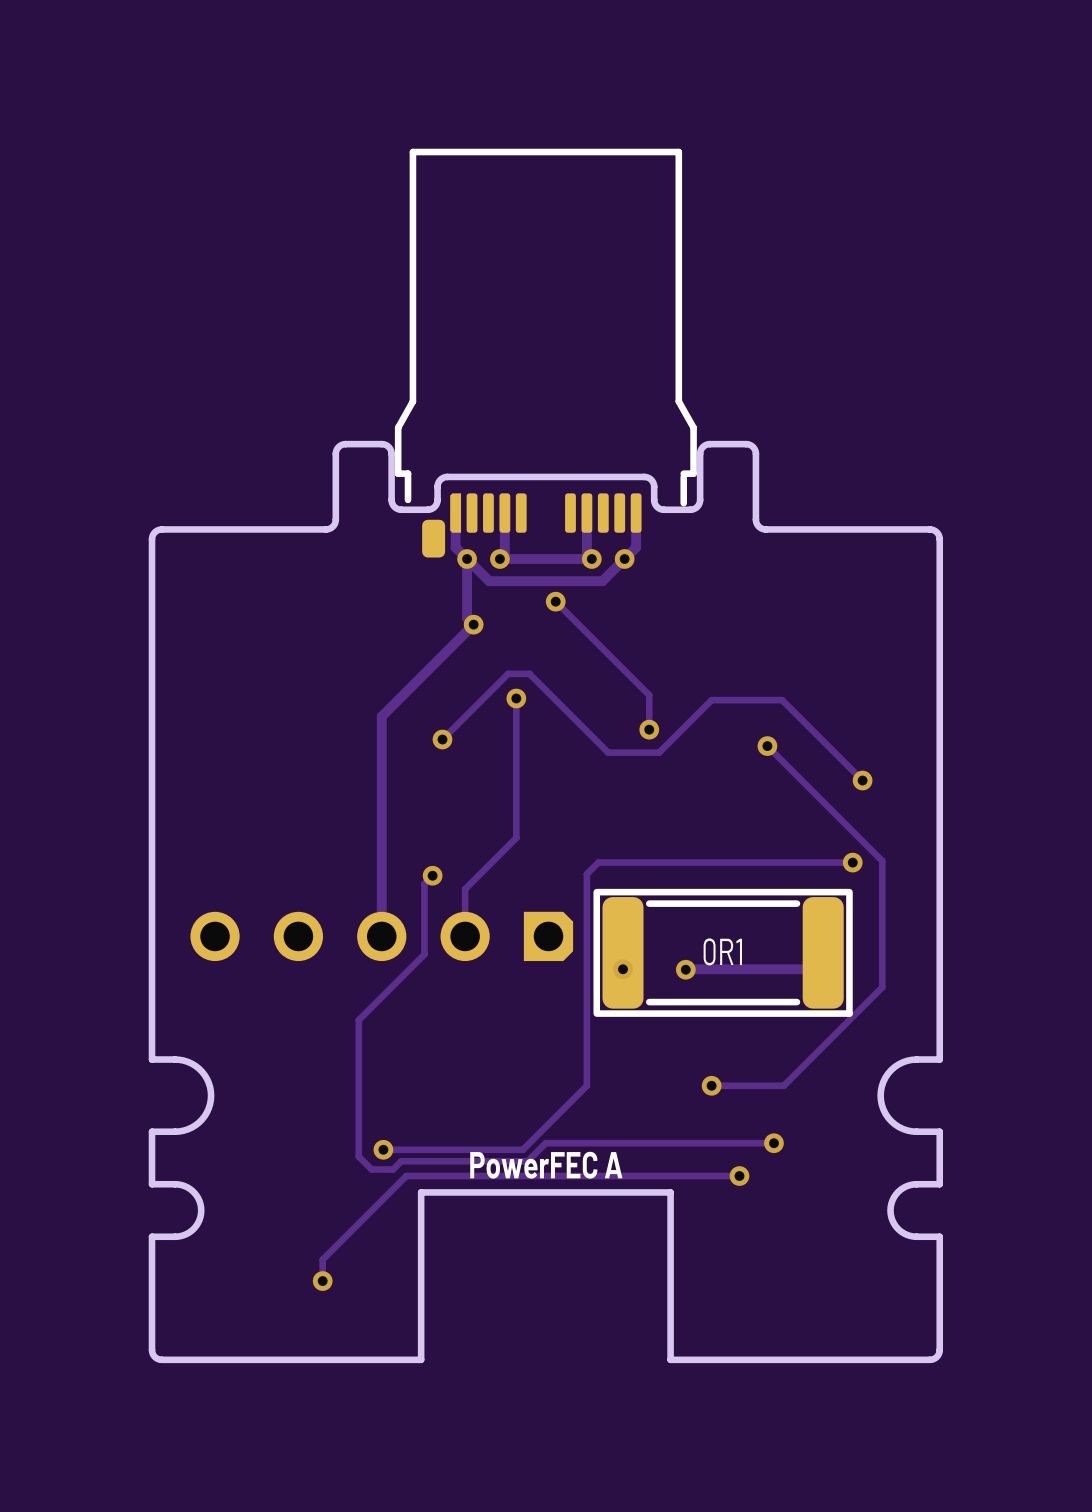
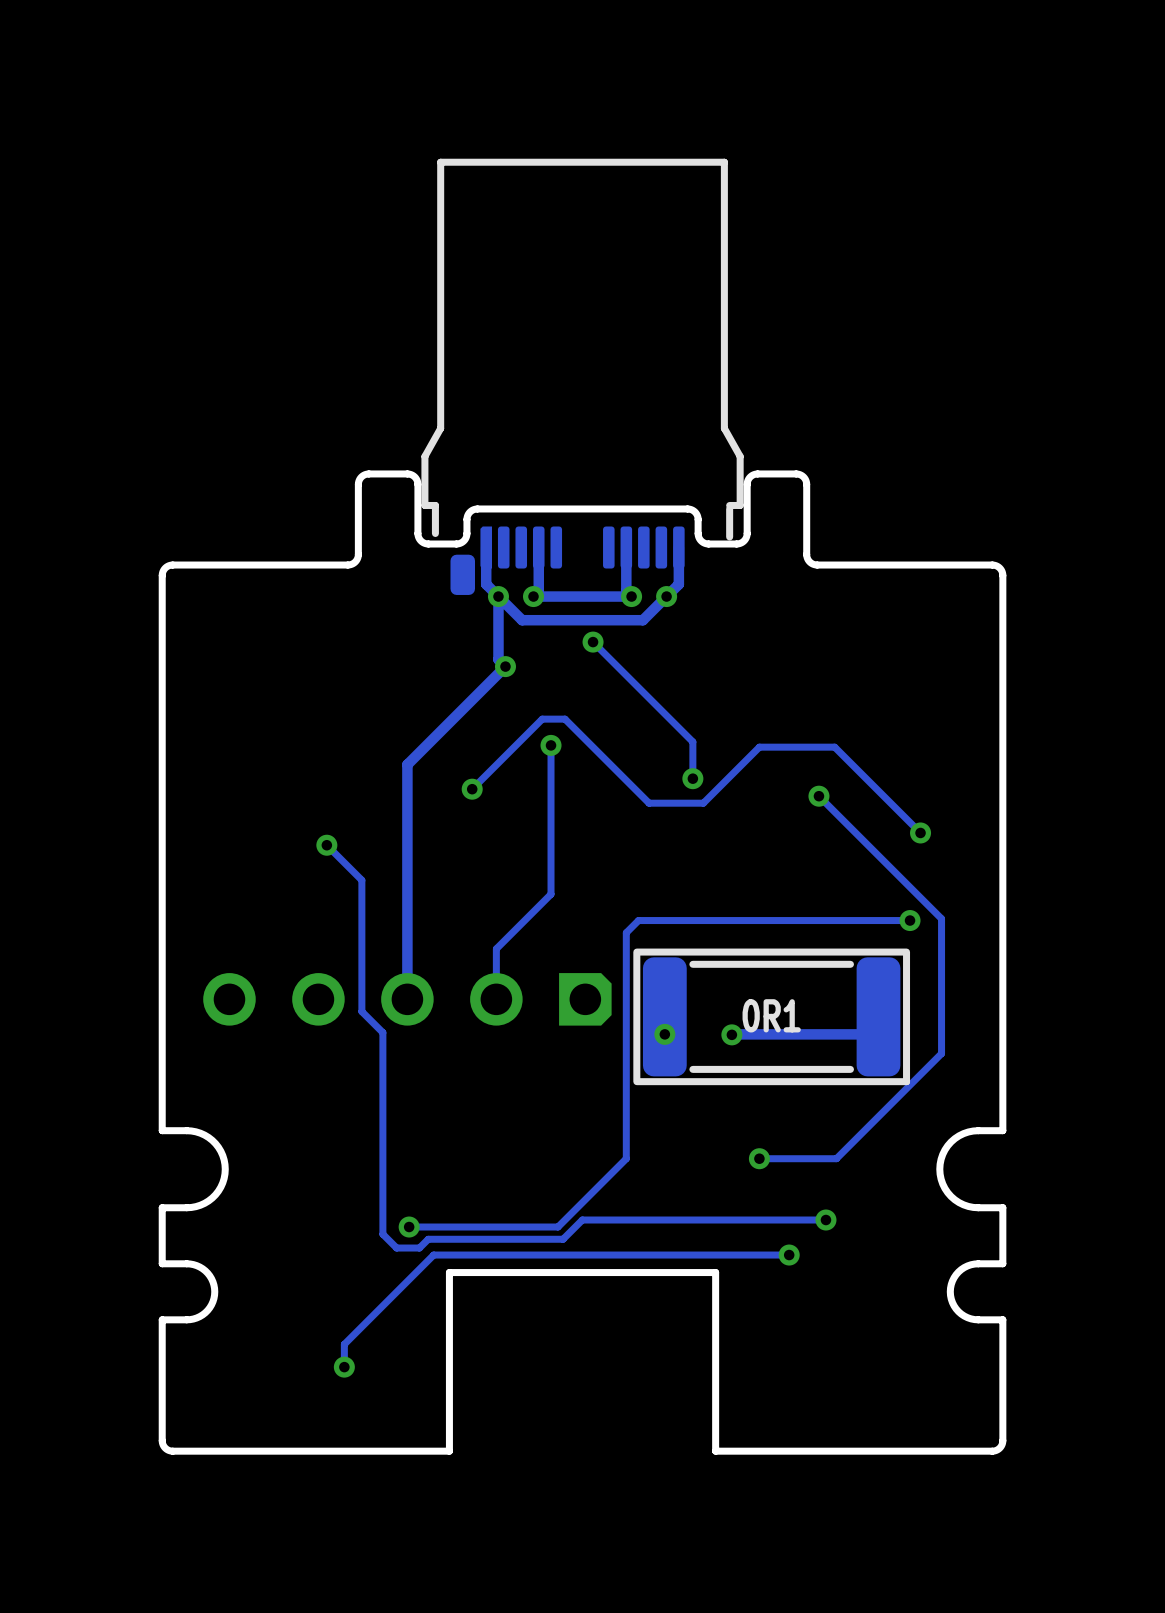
track: (432, 875) (424, 883) (424, 954) (358, 1020) -> (326, 845) (361, 880) (361, 1011) (382, 1032) (382, 1088)
via position: (432, 875) -> (326, 845)
text: PowerFEC A (546, 1165) -> none

